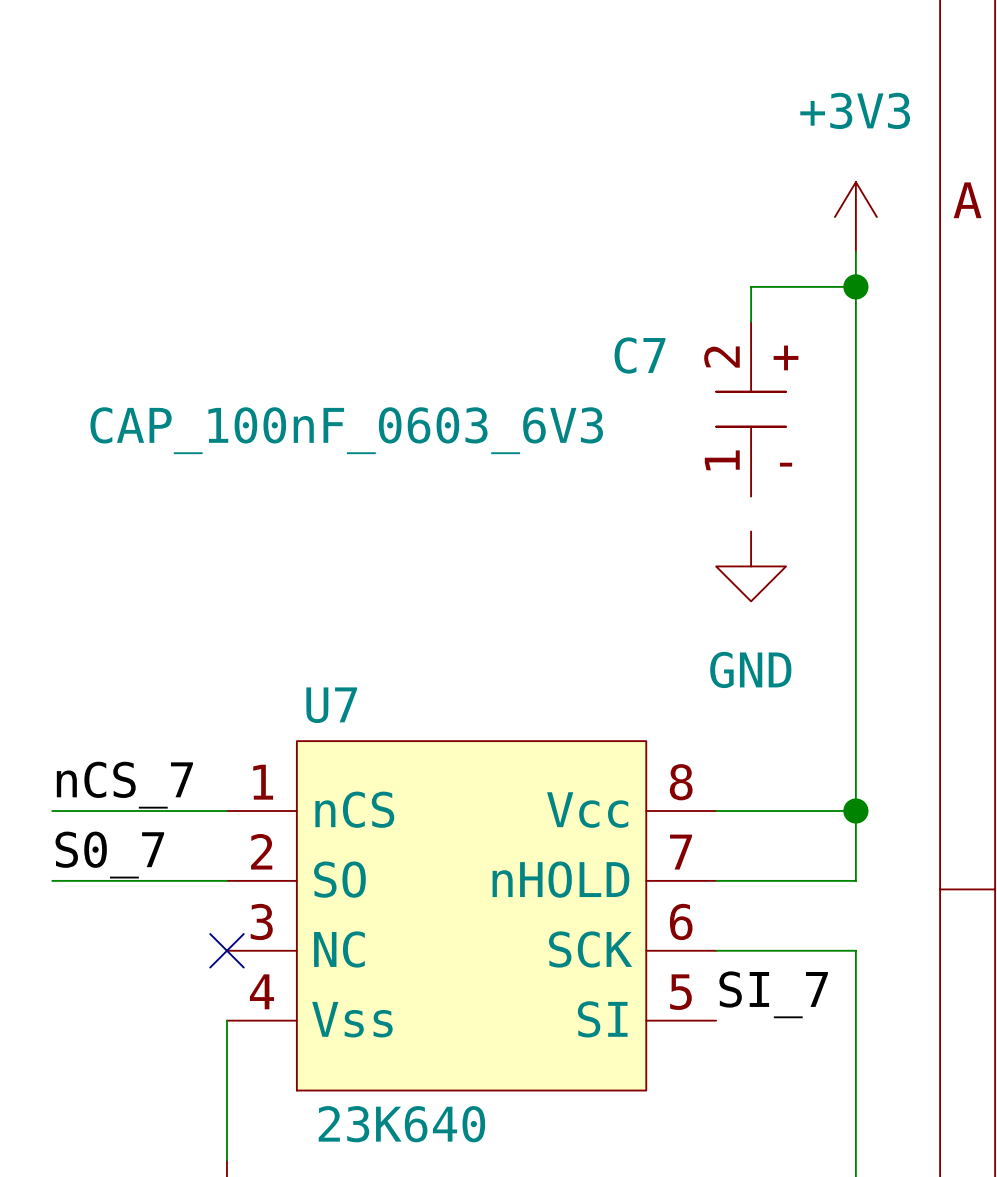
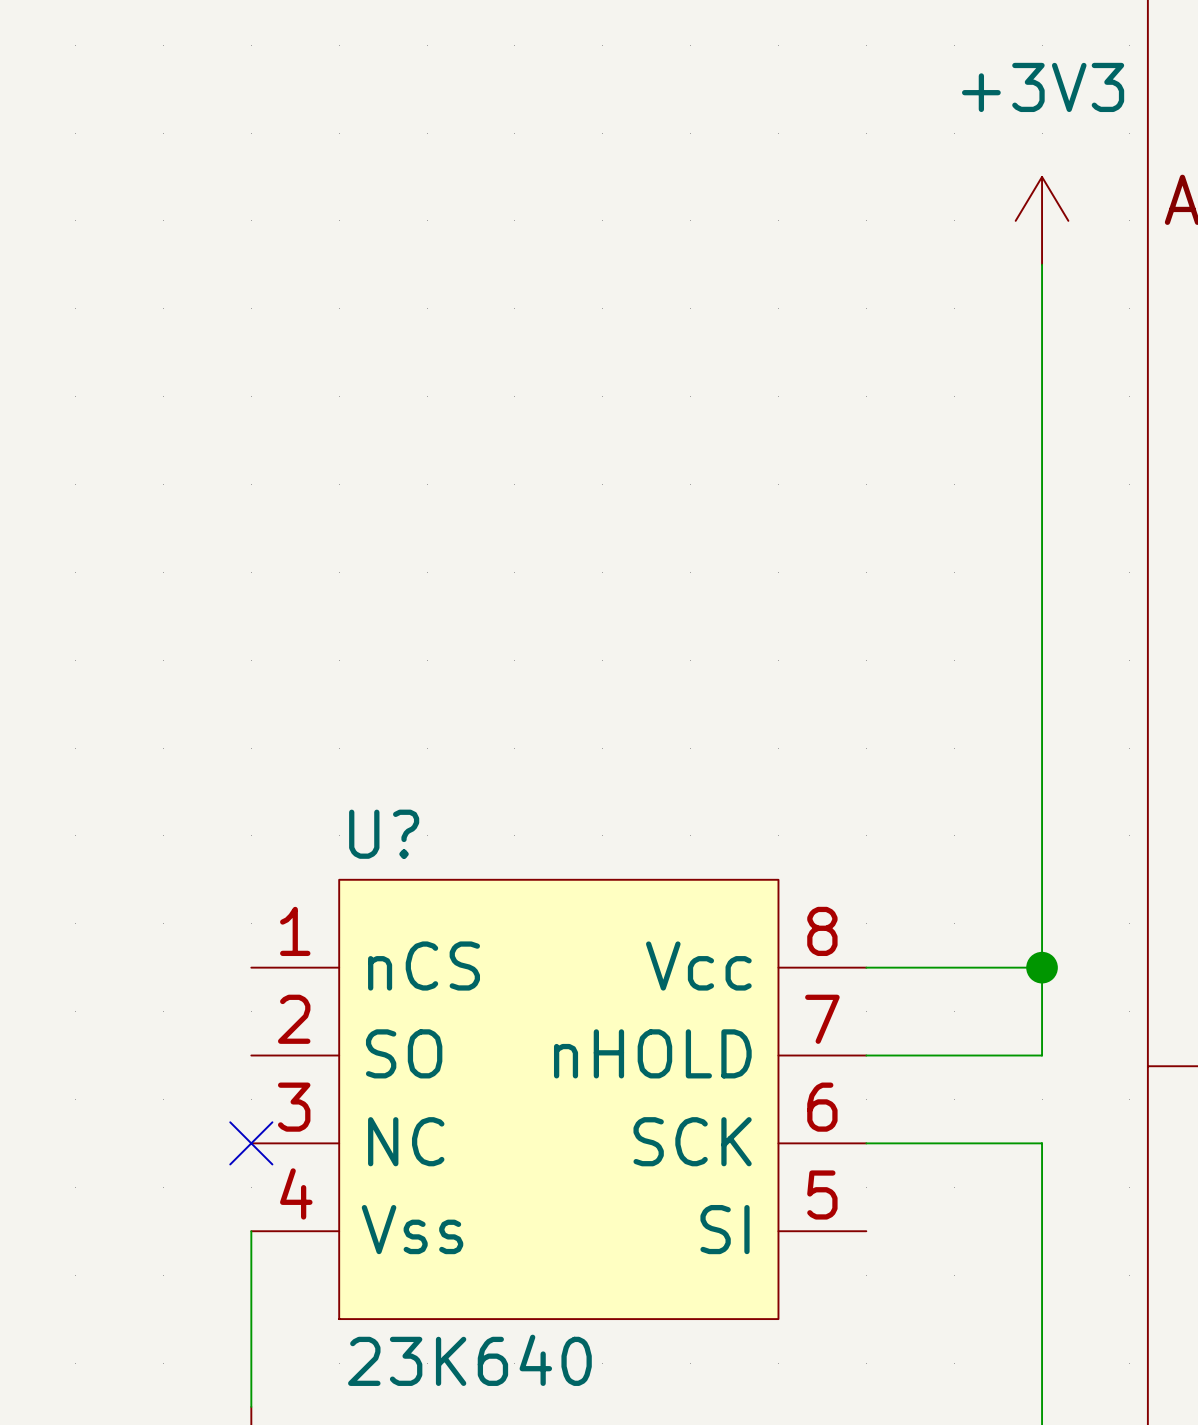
wire: (855, 286) (751, 286) (751, 321) -> none
junction: (855, 286) -> none
C7: CAP_100nF_0603_6V3 (751, 409) -> none
power symbol: GND (751, 566) -> none
U7 name: U7 (331, 705) -> U? (384, 834)
label: nCS_7 (124, 785) -> none
wire: (52, 811) (226, 811) -> none
label: S0_7 (109, 855) -> none
wire: (52, 880) (226, 880) -> none
label: SI_7 (773, 994) -> none

